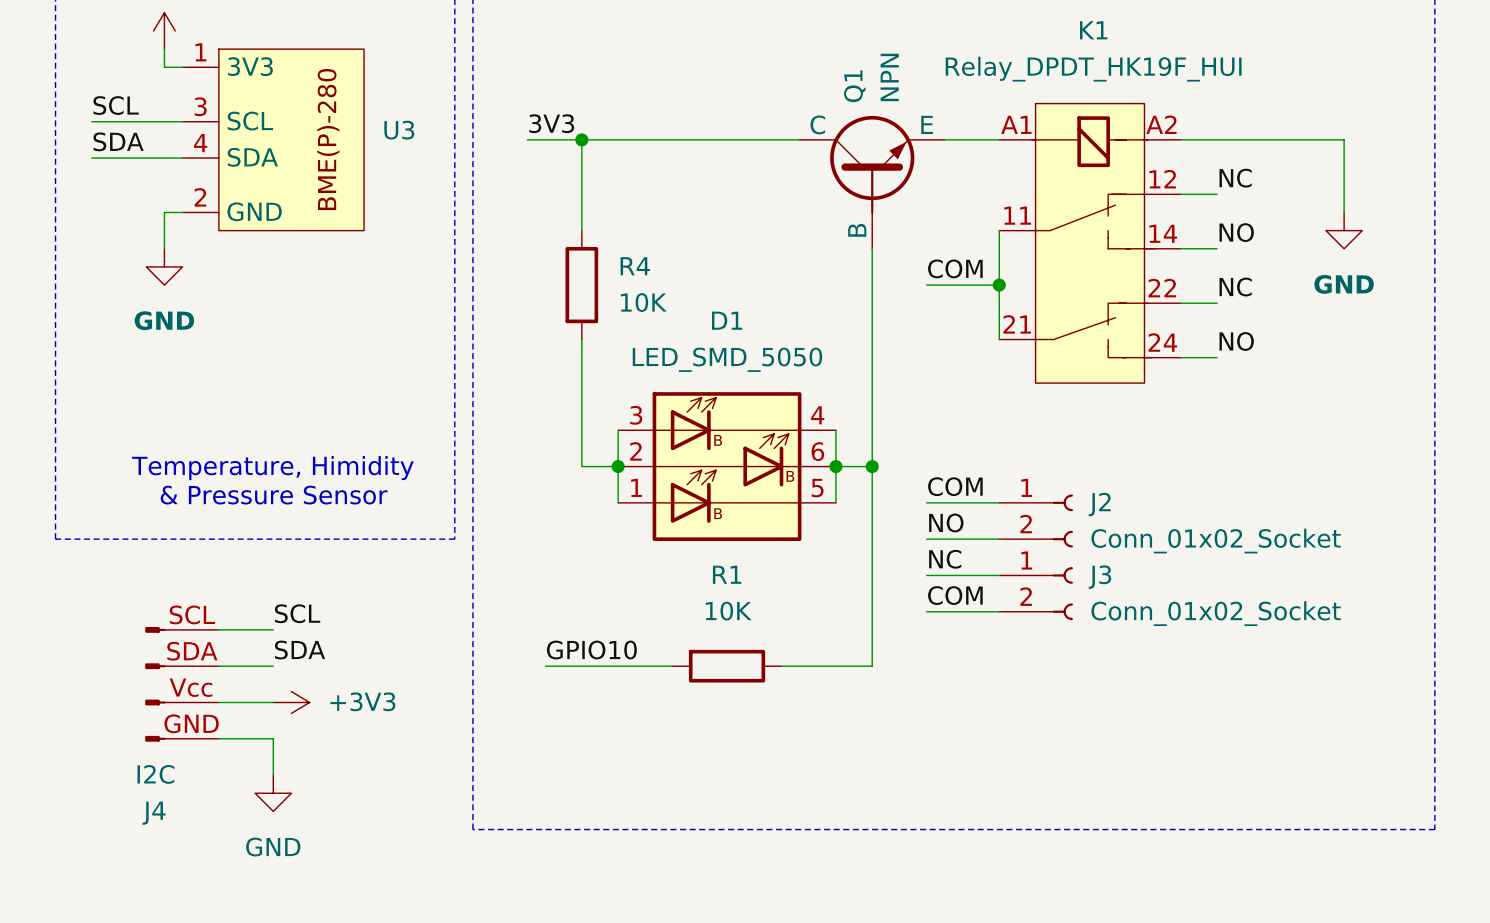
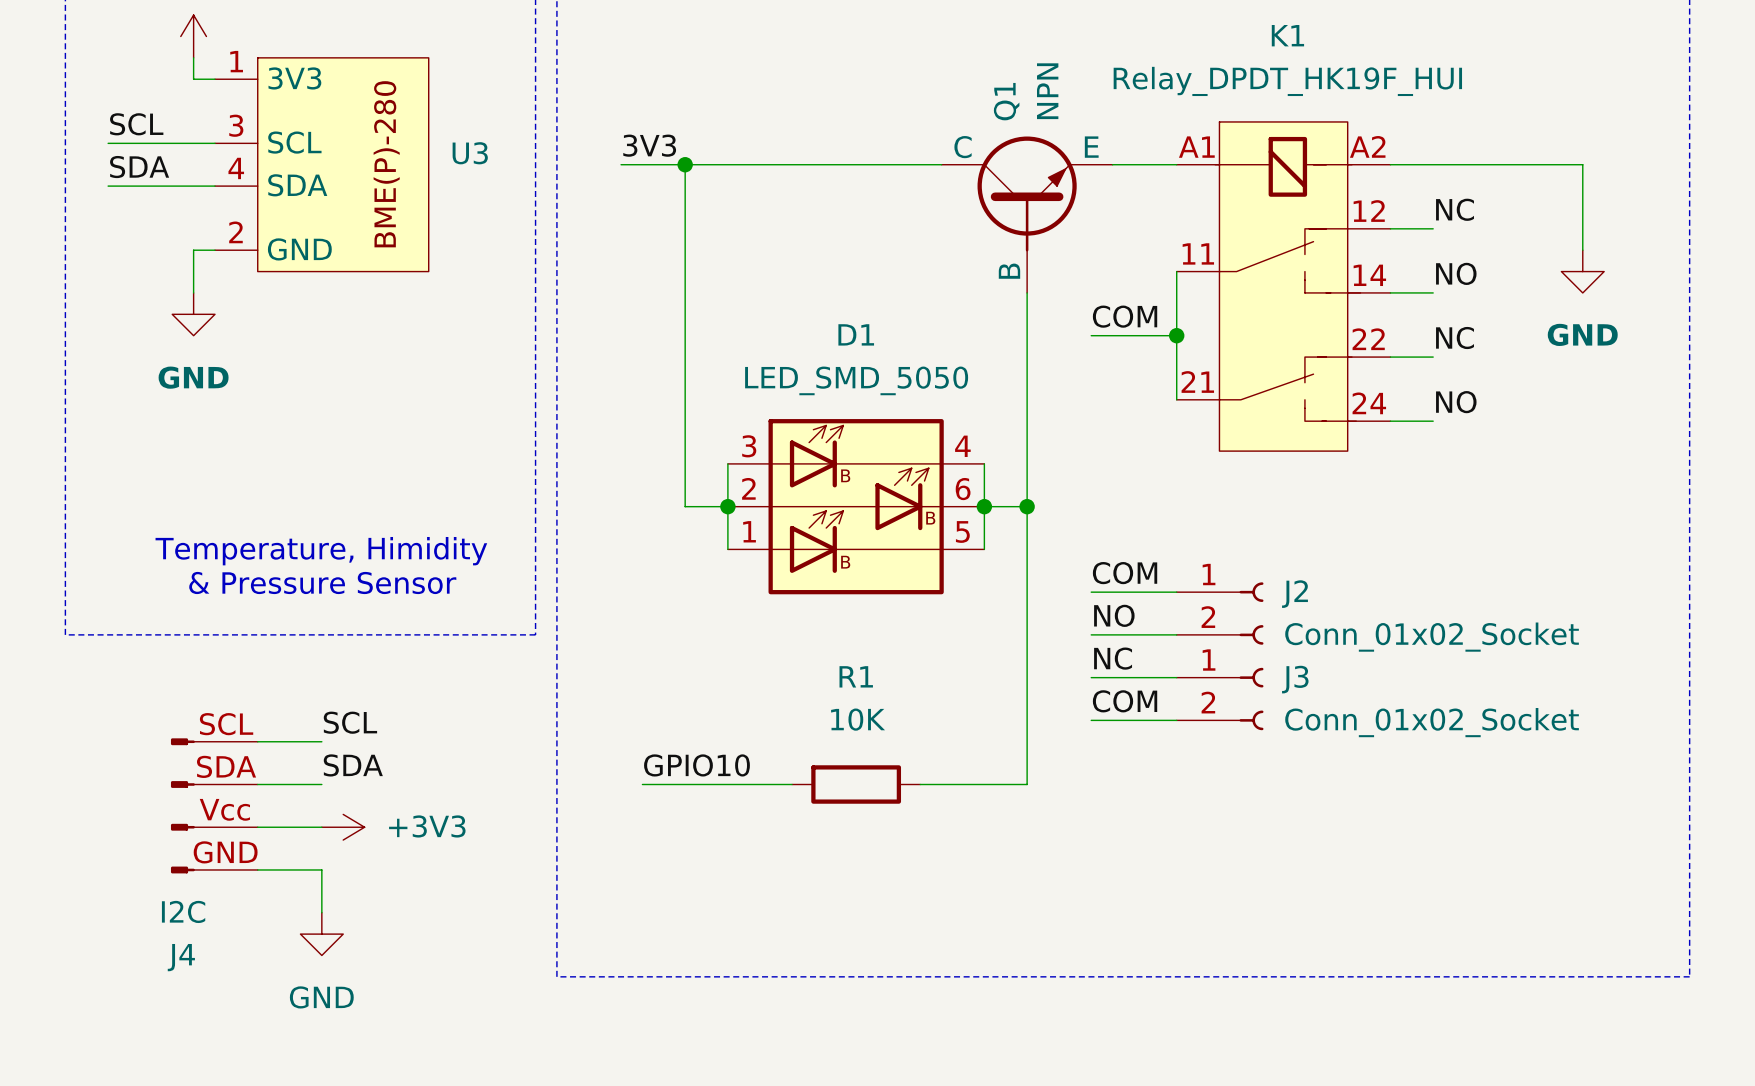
wire: none -> (685, 271) (685, 399)
R4: 10K (581, 285) -> none
wire: none -> (984, 463) (984, 506) (1027, 506)
wire: (581, 430) (581, 466) (618, 466) (618, 502) -> (685, 506) (727, 506) (727, 463)
junction: none -> (984, 506)
junction: none -> (1027, 506)
junction position: (618, 466) -> (727, 506)
D1 position: (727, 466) -> (856, 506)
junction: (835, 466) -> none
wire: (872, 466) (835, 466) (835, 502) -> none
junction: (872, 466) -> none

